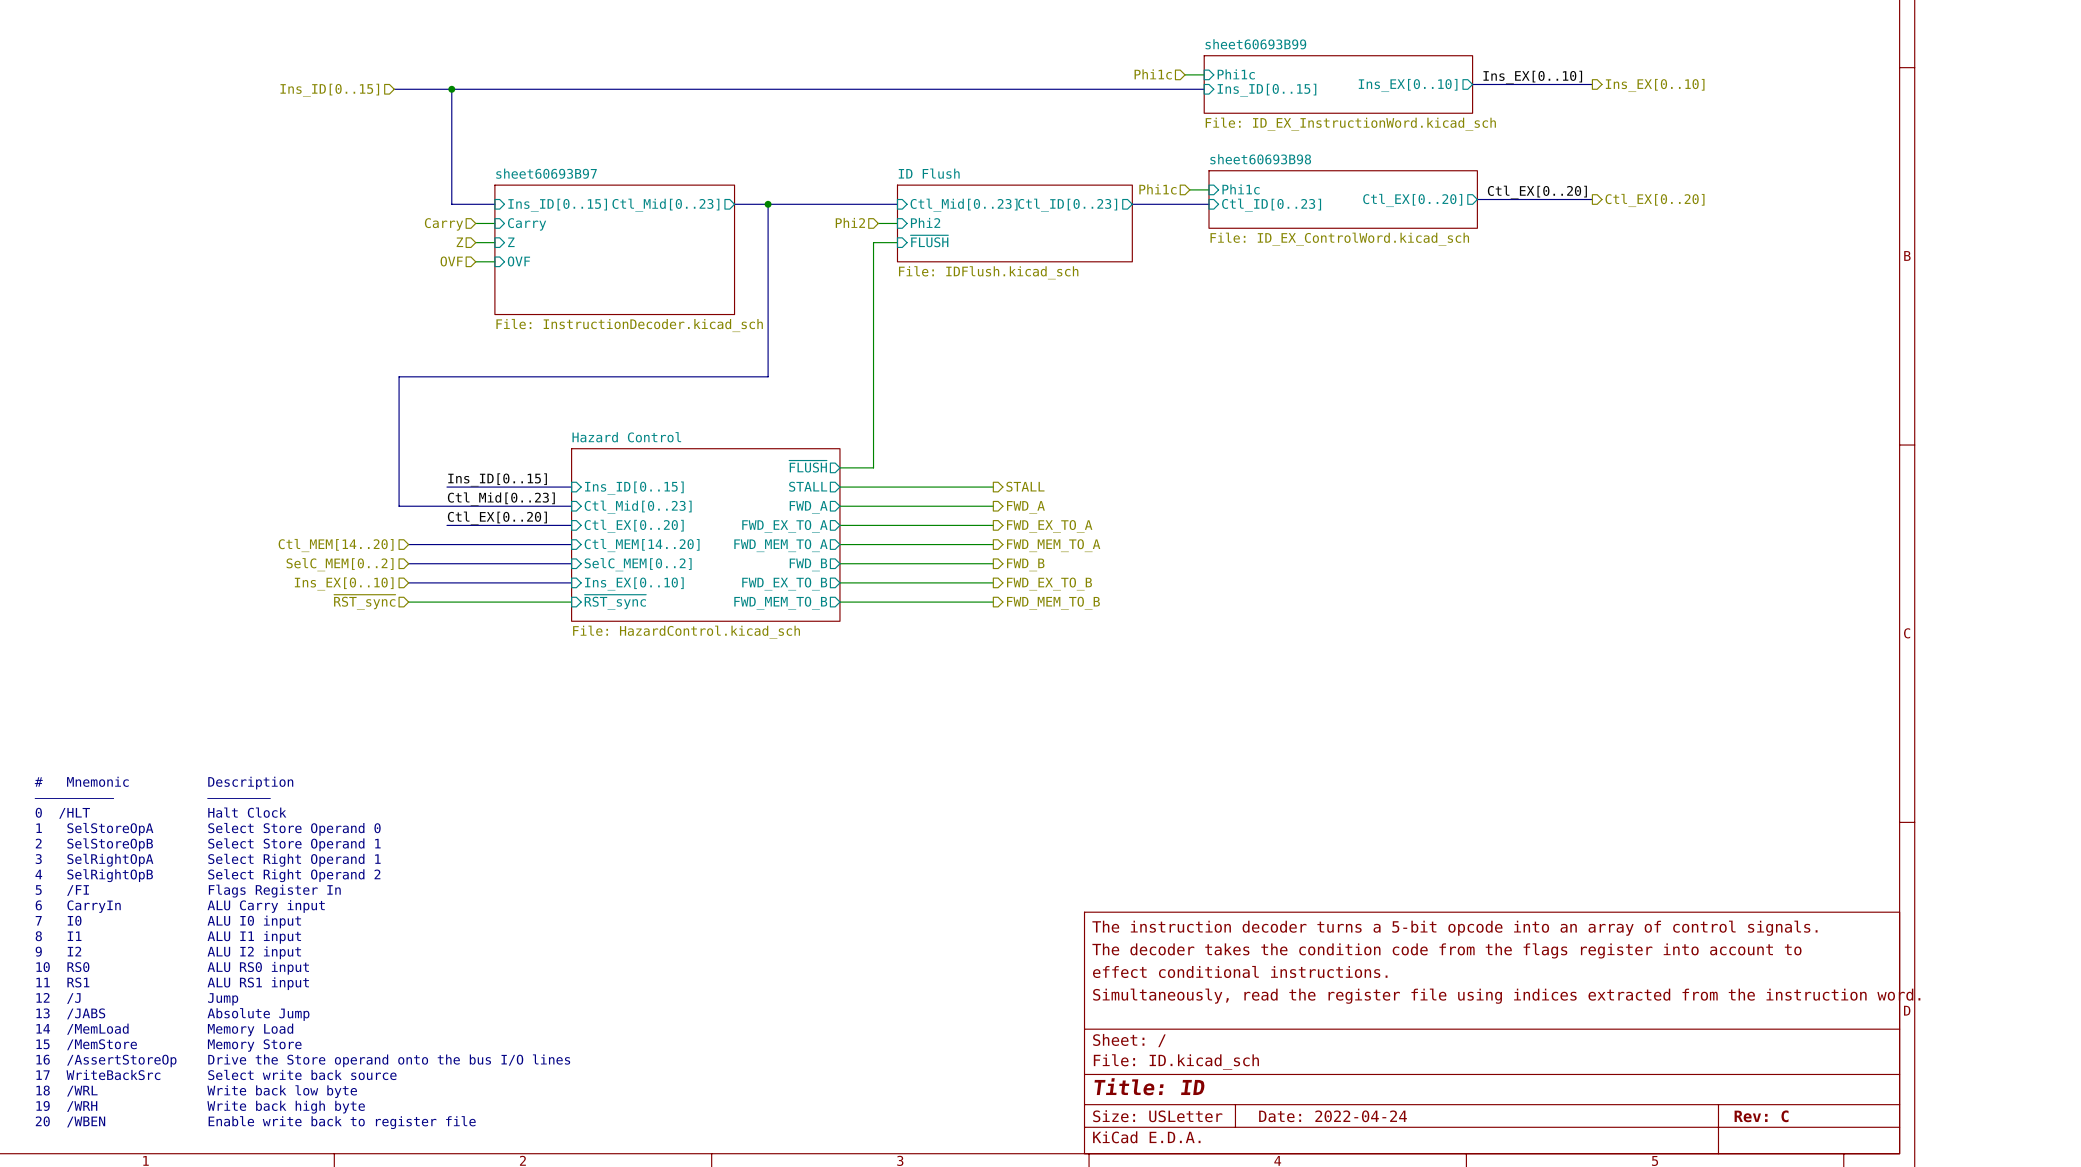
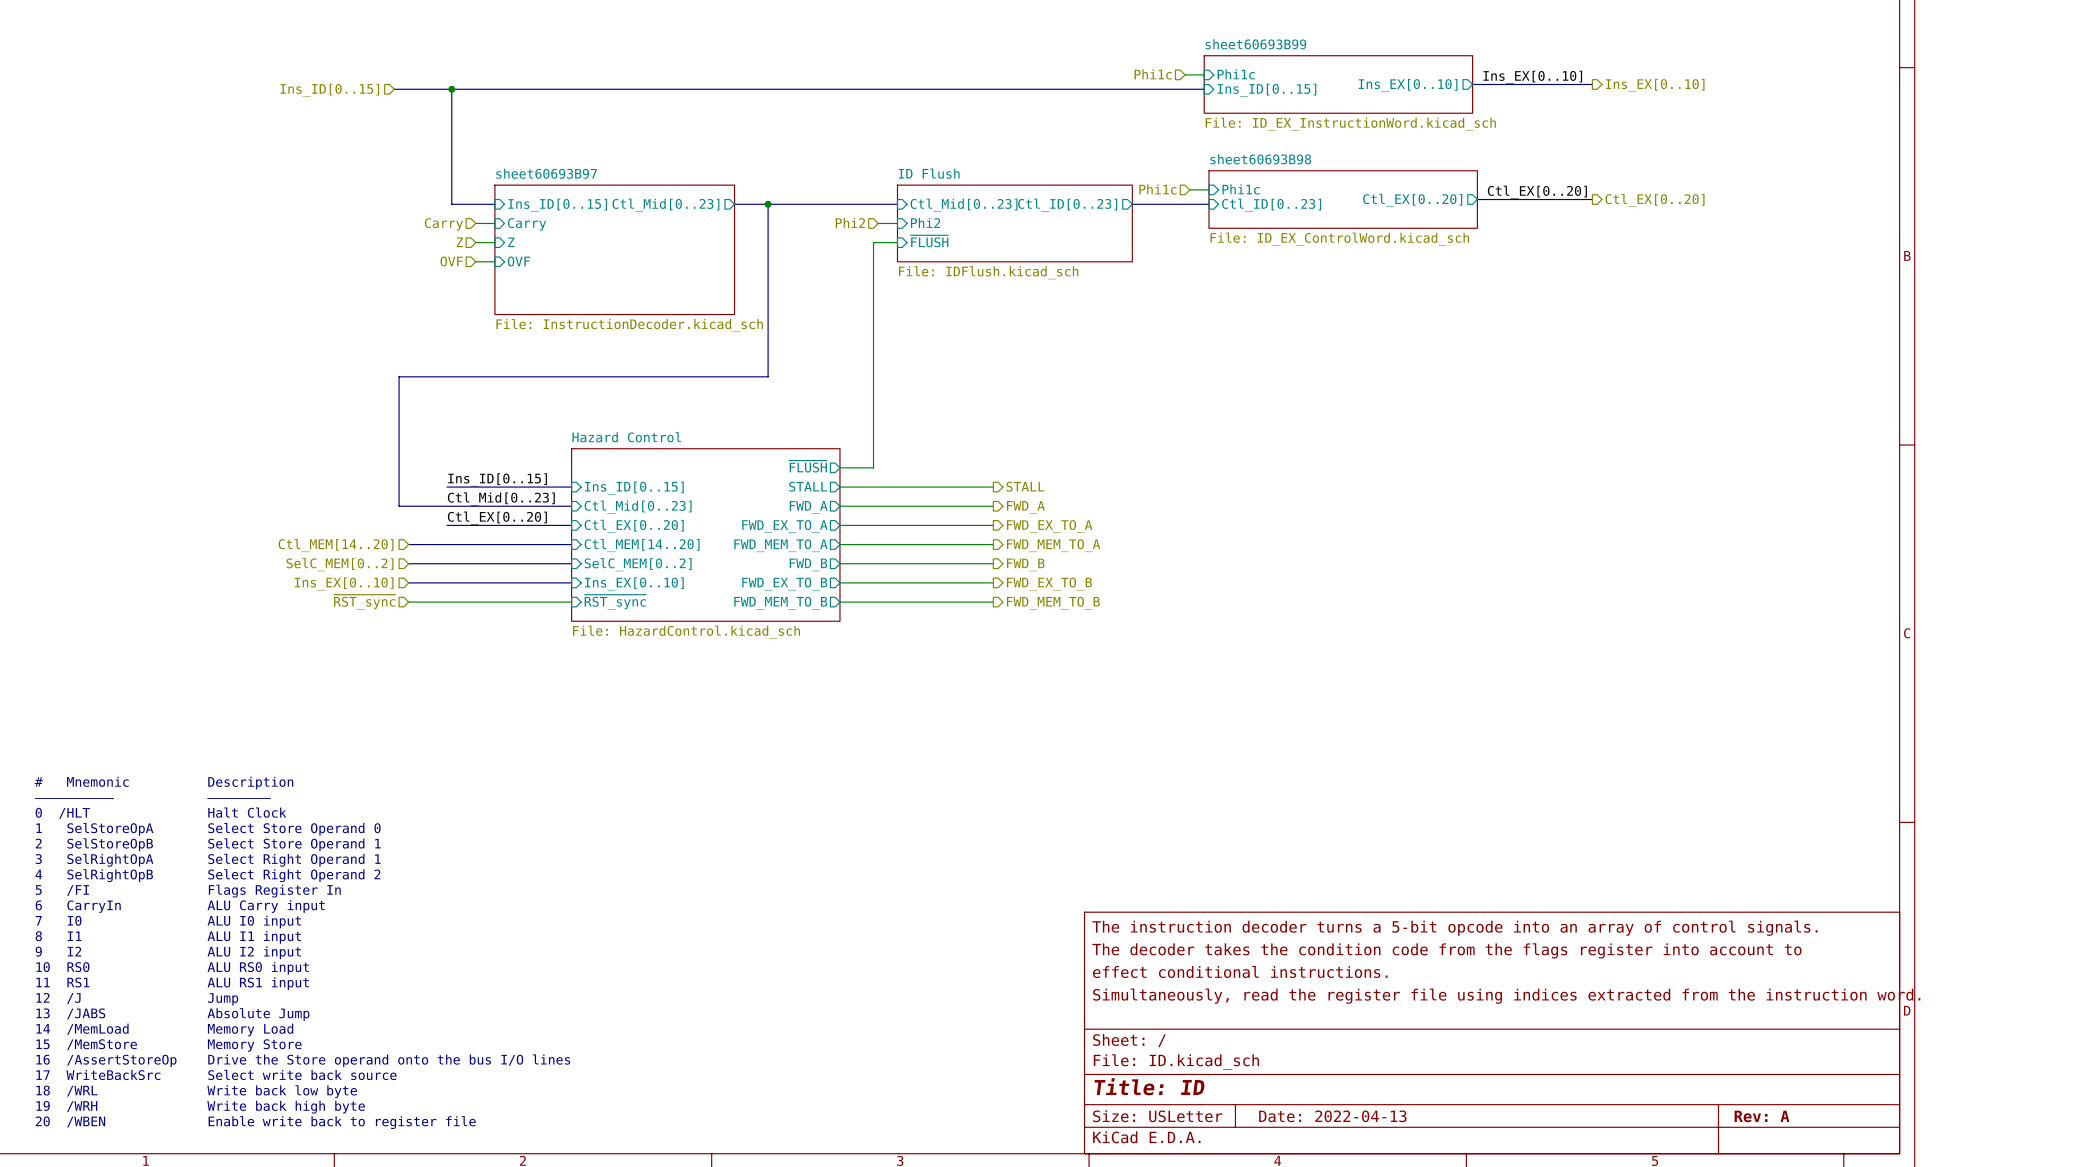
title block: Date: 2022-04-24 (1333, 1116) -> Date: 2022-04-13 (1332, 1116)
title block: Rev: C (1761, 1116) -> Rev: A (1762, 1116)

